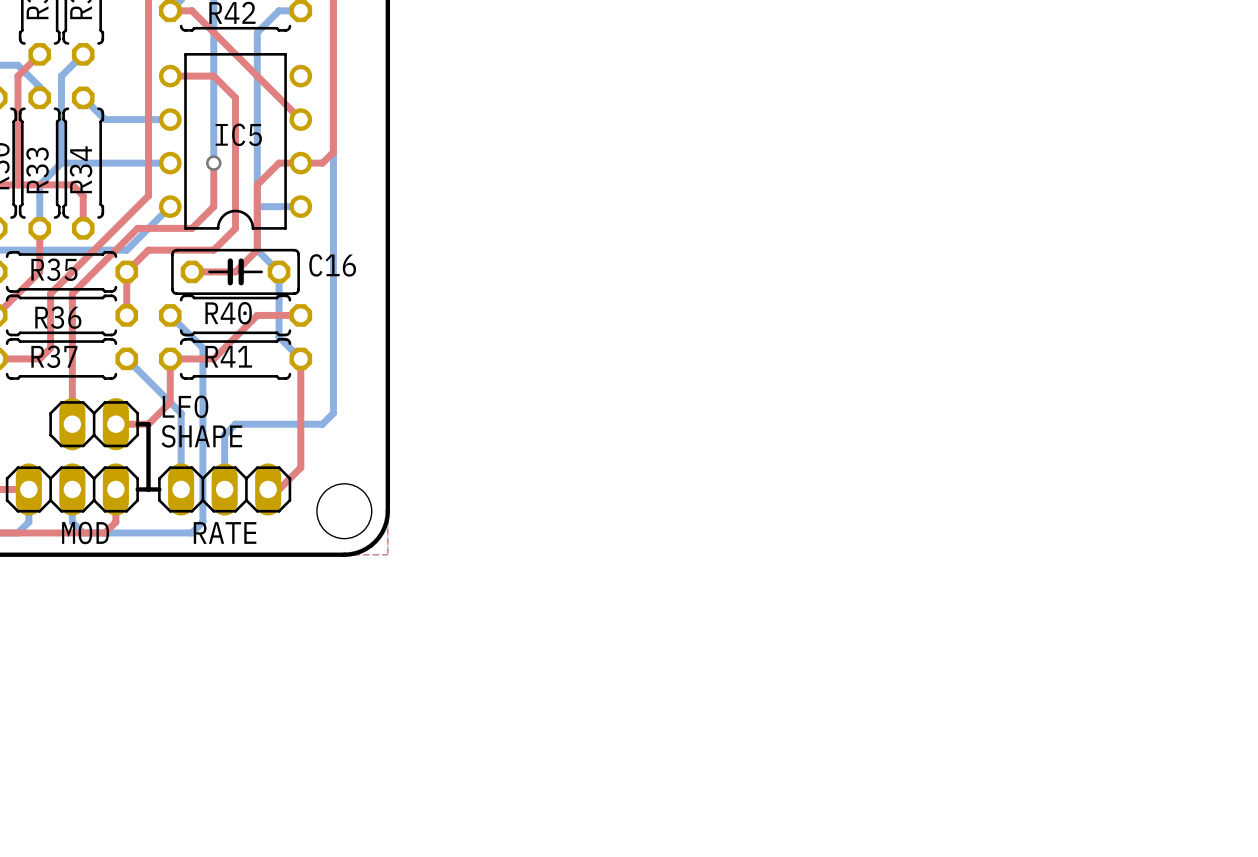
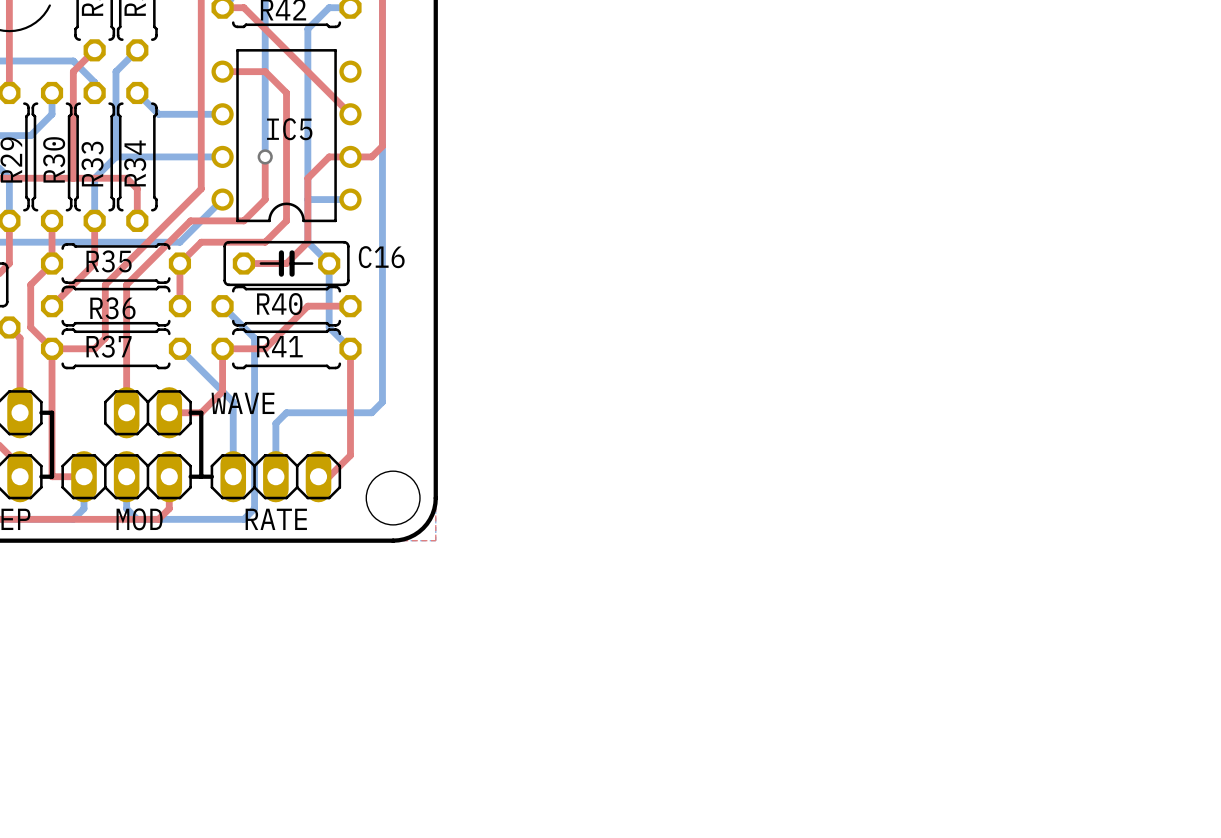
text: LFO (185, 406) -> none
SHAPE name: SHAPE (201, 436) -> WAVE (243, 403)

